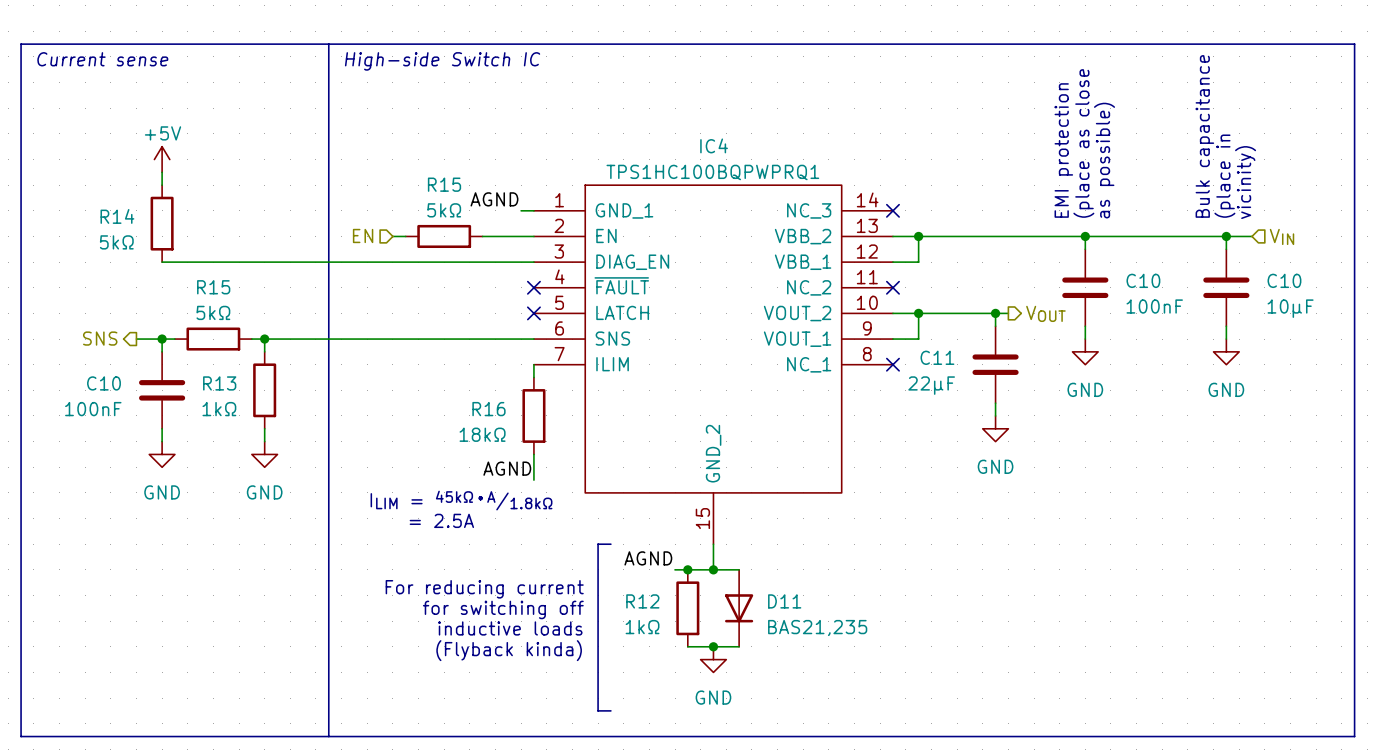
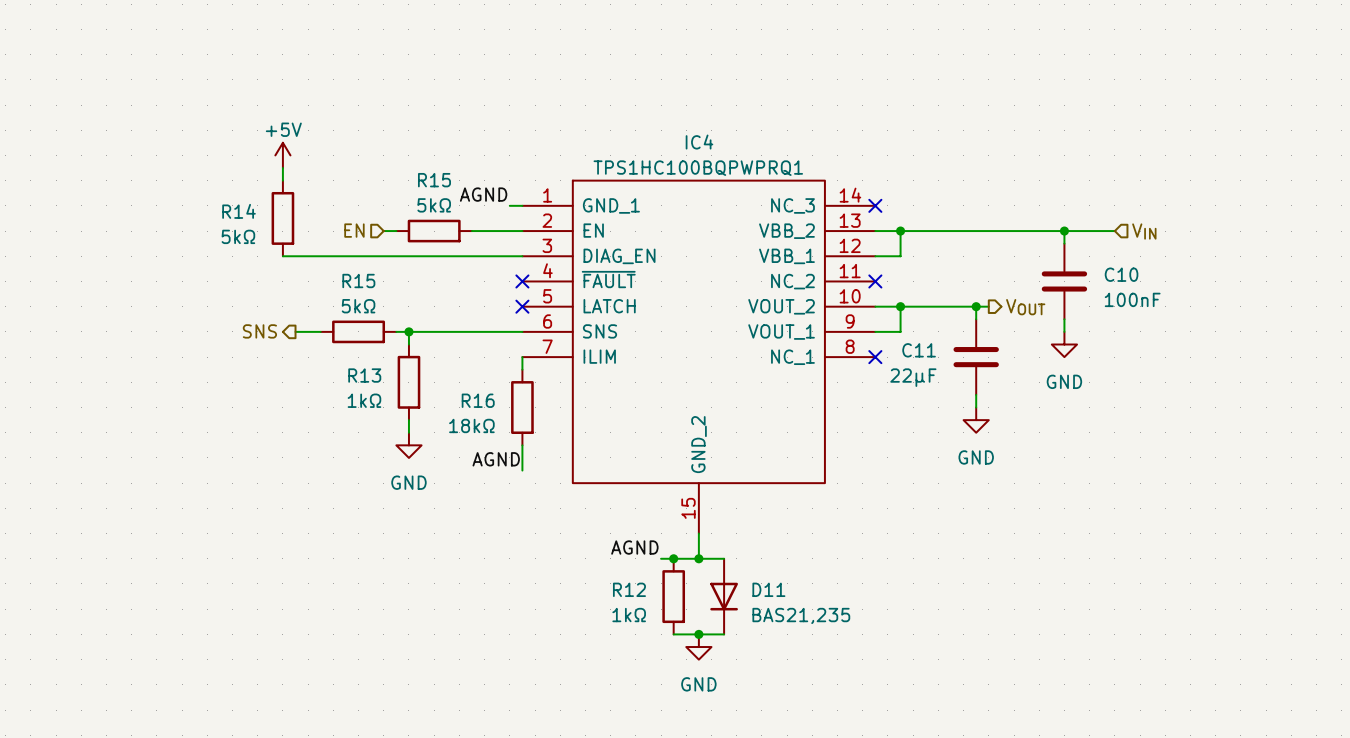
line: (21, 44) (1354, 44) (1354, 736) (21, 736) (21, 44) -> none
line: (328, 44) (328, 736) -> none
text: Current sense (102, 59) -> none
text: High-side Switch IC (442, 61) -> none
text: Bulk capacitance (1204, 136) -> none
text: (place as close (1083, 143) -> none
text: EMI protection (1063, 150) -> none
power symbol position: +5V (162, 159) -> +5V (282, 155)
text: as possible) (1104, 160) -> none
wire: (162, 172) (162, 185) -> (282, 168) (282, 180)
text: (place in (1224, 176) -> none
text: vicinity) (1245, 182) -> none
R14 position: (162, 223) -> (282, 218)
wire: (1136, 236) (1252, 236) -> none
wire: (1226, 236) (1226, 249) -> none
junction: (1226, 236) -> none
hierarchical label position: VIN (1282, 236) -> VIN (1144, 231)
wire: (162, 262) (290, 262) -> none
C10: 10µF (1226, 287) -> none
wire: (1226, 326) (1226, 339) -> none
hierarchical label position: SNS (100, 338) -> SNS (259, 331)
wire: (136, 339) (174, 339) -> none
wire: (162, 339) (162, 351) -> none
junction: (162, 339) -> none
R15 position: (213, 339) -> (358, 331)
wire: (251, 339) (303, 339) -> none
wire: (264, 339) (264, 351) -> (408, 331) (408, 344)
junction: (264, 339) -> none
wire: (328, 339) (405, 339) -> none
junction: none -> (408, 331)
power symbol: GND (1226, 351) -> none
C10: 100nF (162, 390) -> none
R13 position: (264, 390) -> (408, 382)
wire: (162, 428) (162, 441) -> none
wire: (264, 428) (264, 441) -> (408, 420) (408, 432)
power symbol: GND (162, 454) -> none
power symbol: GND (264, 454) -> none
power symbol: none -> GND (408, 445)
text: ILIM = 45kΩ•A/1.8kΩ (461, 500) -> none
text: = 2.5A (441, 520) -> none
line: (610, 544) (598, 544) (598, 710) (610, 710) -> none
text: For reducing current (484, 589) -> none
text: for switching off (503, 609) -> none
text: inductive loads (510, 628) -> none
text: (Flyback kinda) (509, 650) -> none

